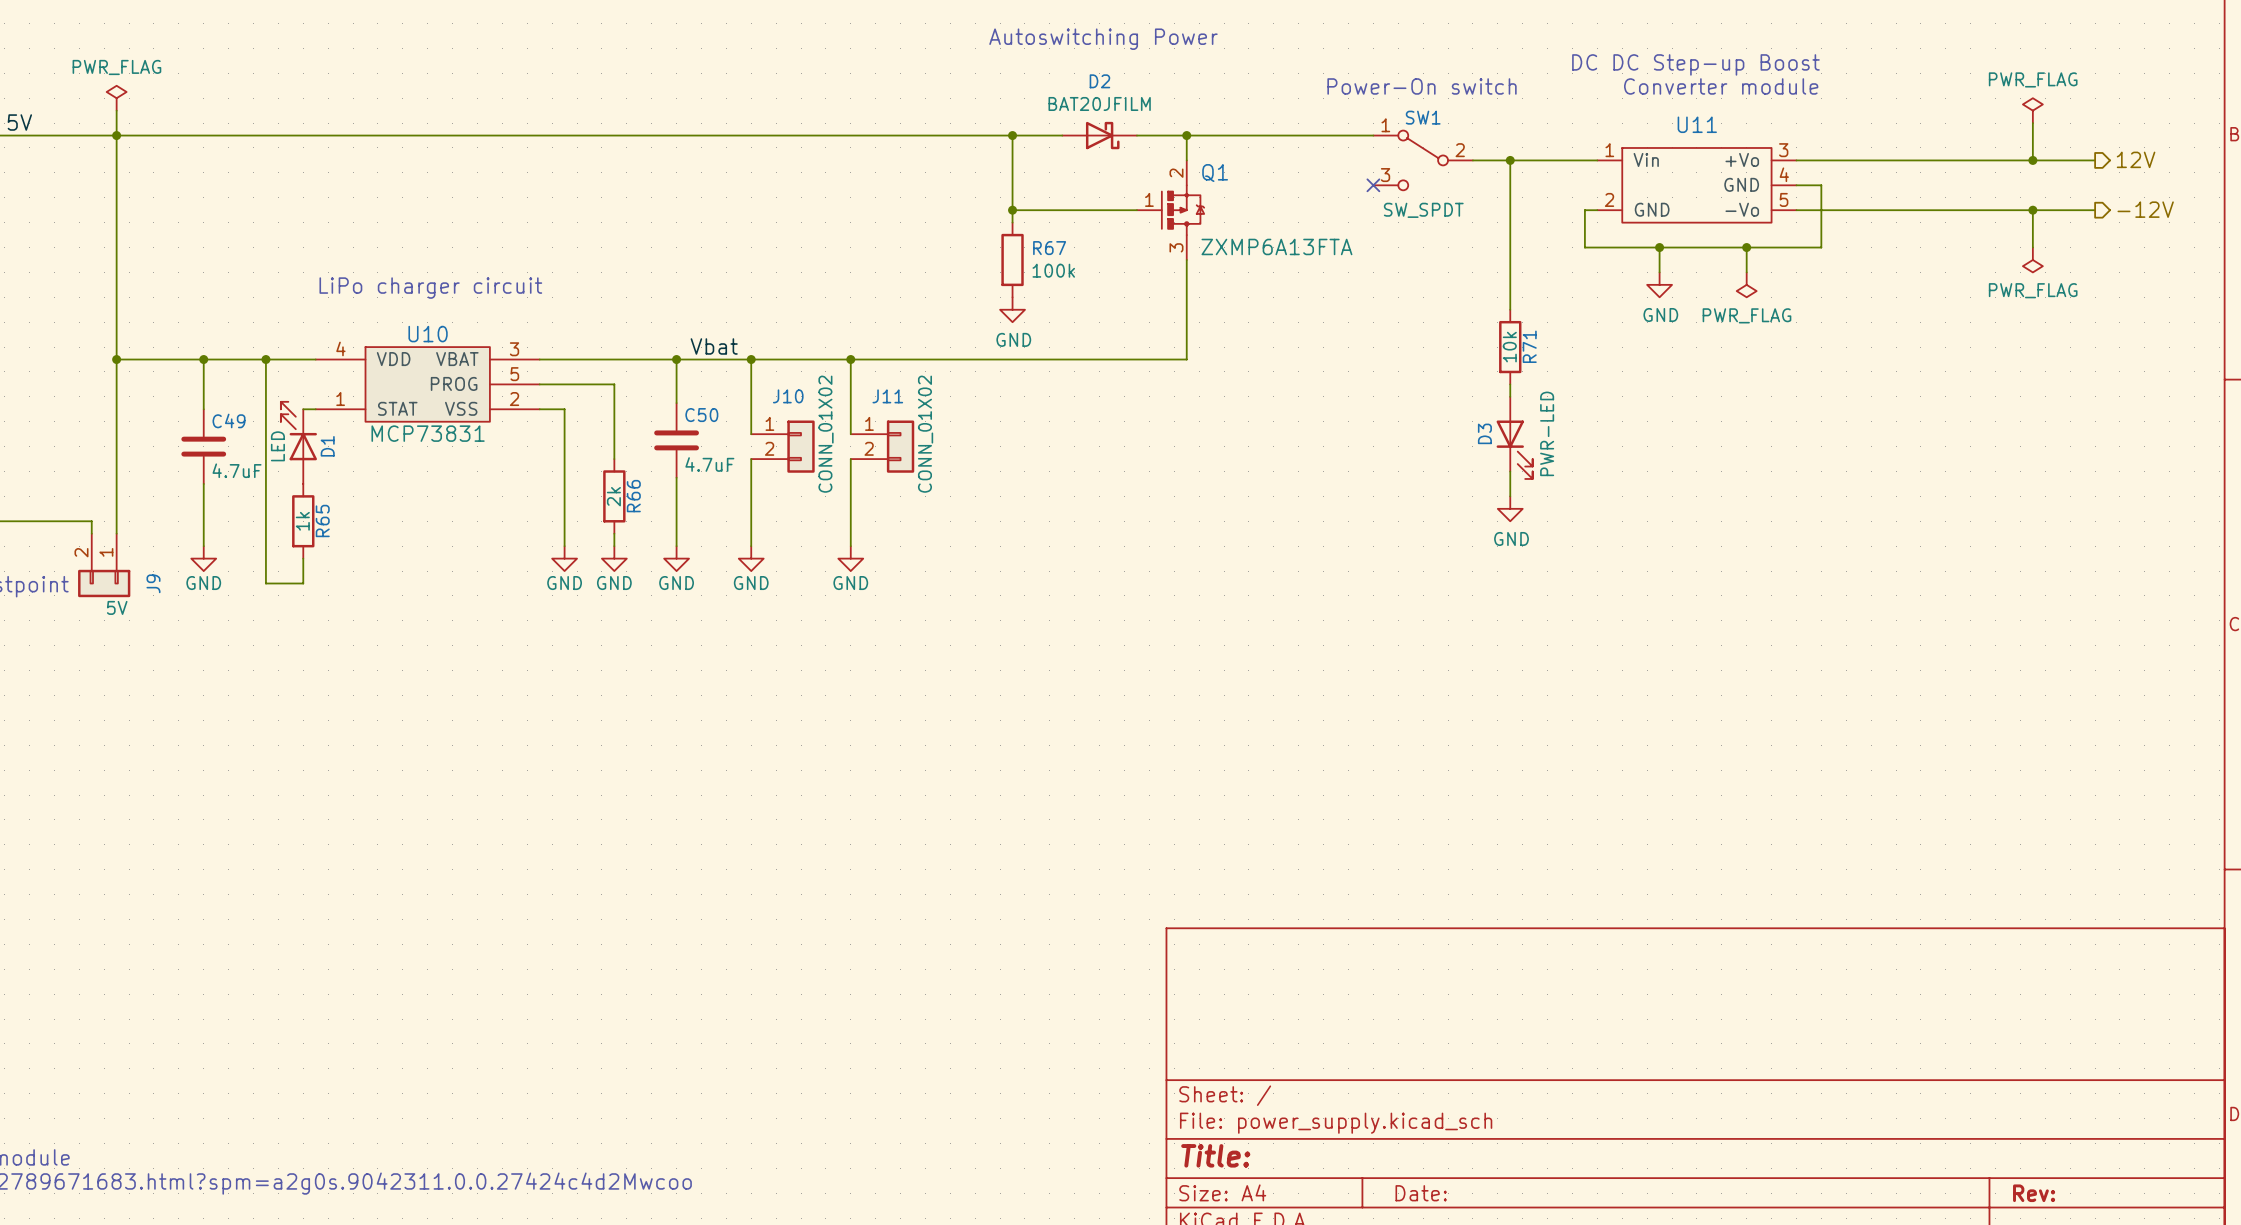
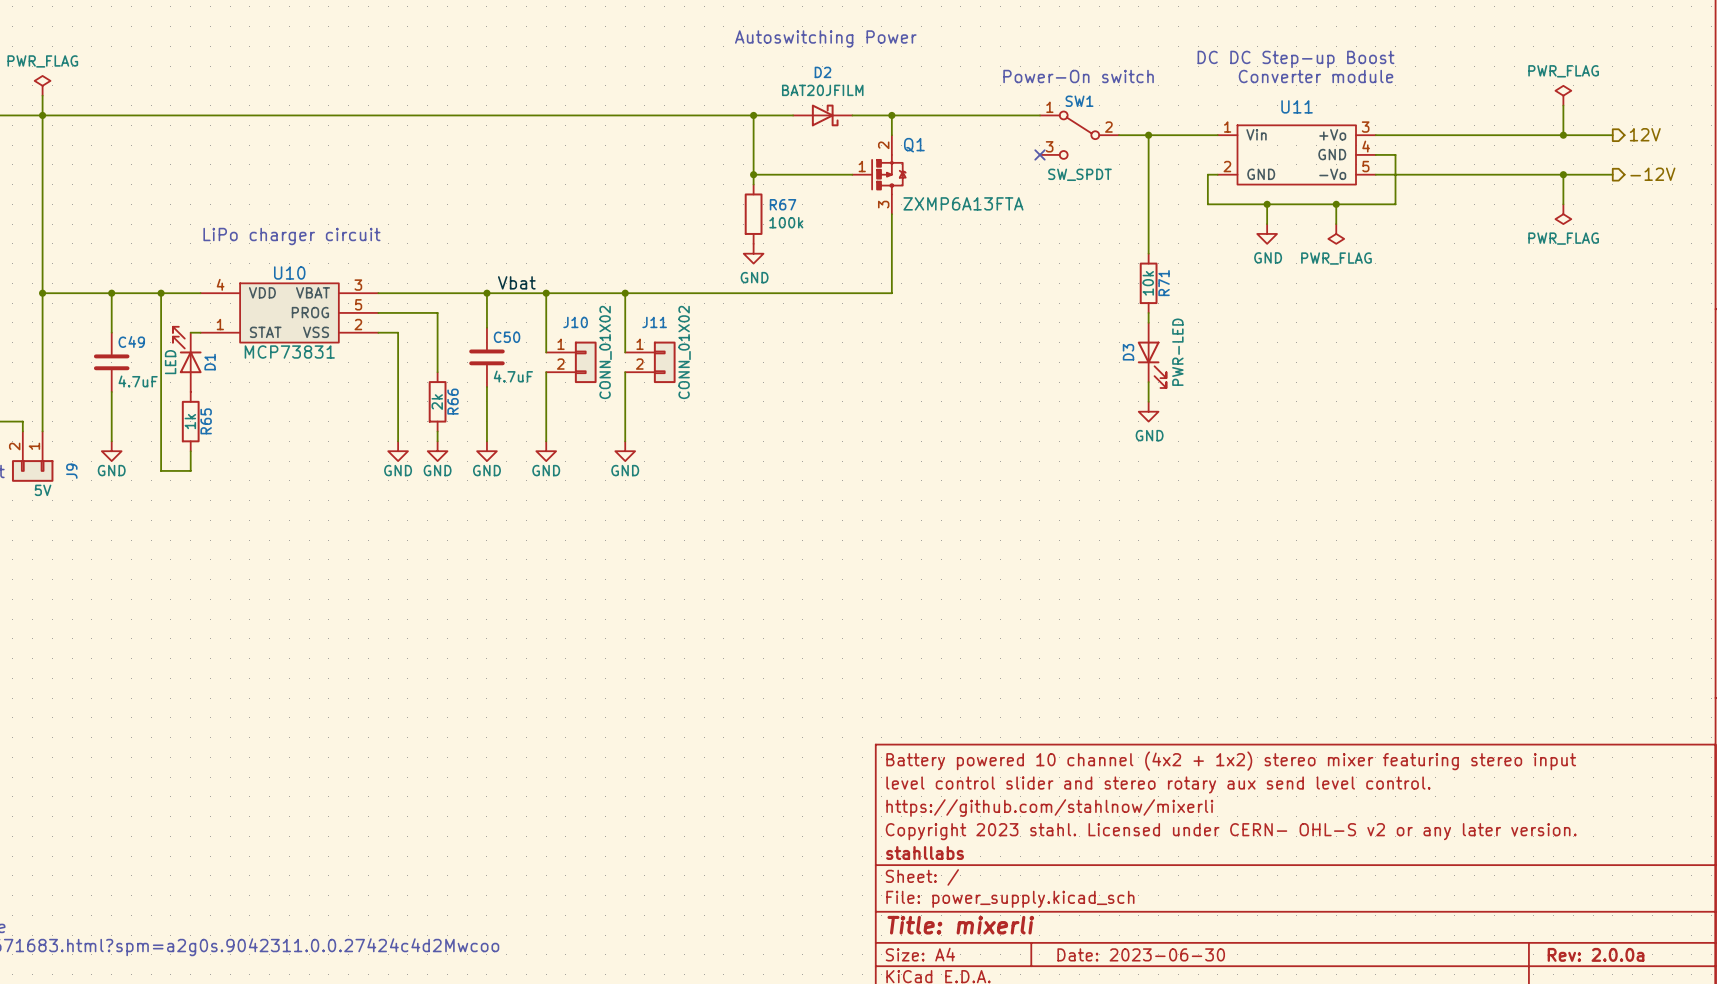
title block: none -> Battery powered 10 channel (4x2 + 1x2) stereo mixer featuring stereo input (1231, 761)
title block: none -> level control slider and stereo rotary aux send level control. (1158, 784)
title block: none -> https://github.com/stahlnow/mixerli (1049, 808)
title block: none -> Copyright 2023 stahl. Licensed under CERN- OHL-S v2 or any later version. (1231, 831)
title block: none -> stahllabs (925, 853)
title block: Title: (1215, 1155) -> Title: mixerli (960, 925)
title block: Date: (1421, 1193) -> Date: 2023-06-30 (1141, 954)
title block: Rev: (2034, 1193) -> Rev: 2.0.0a (1596, 954)

